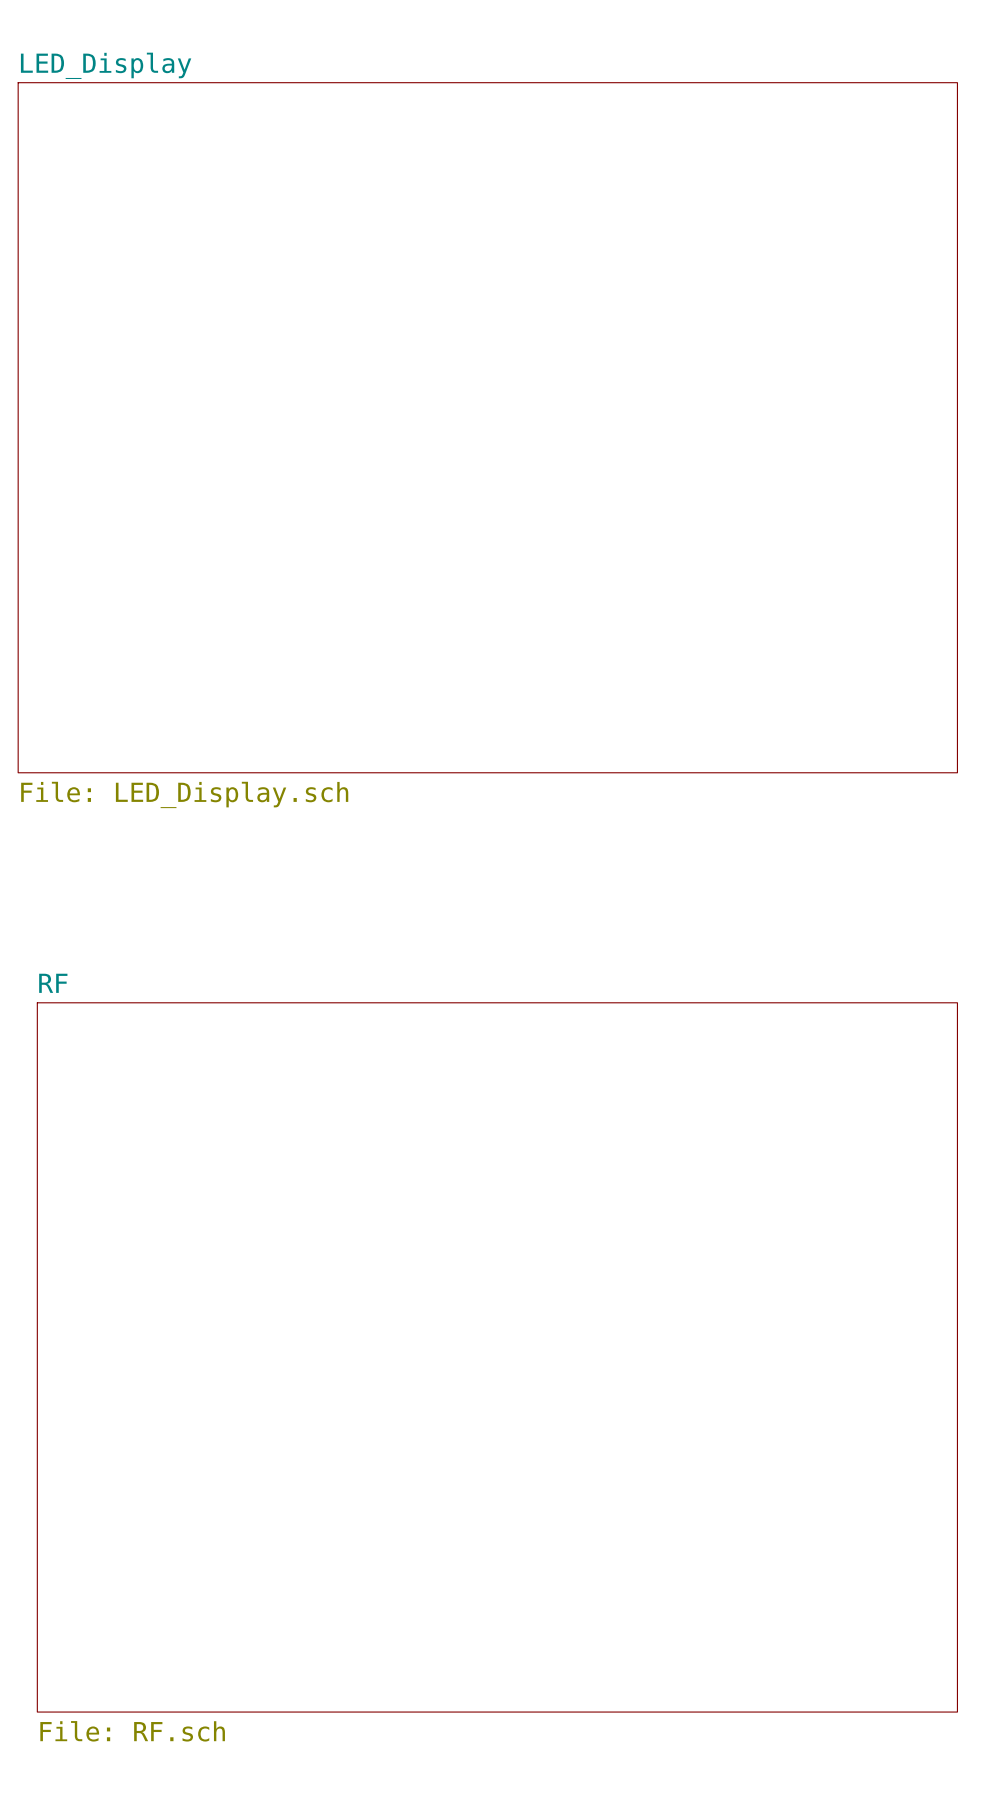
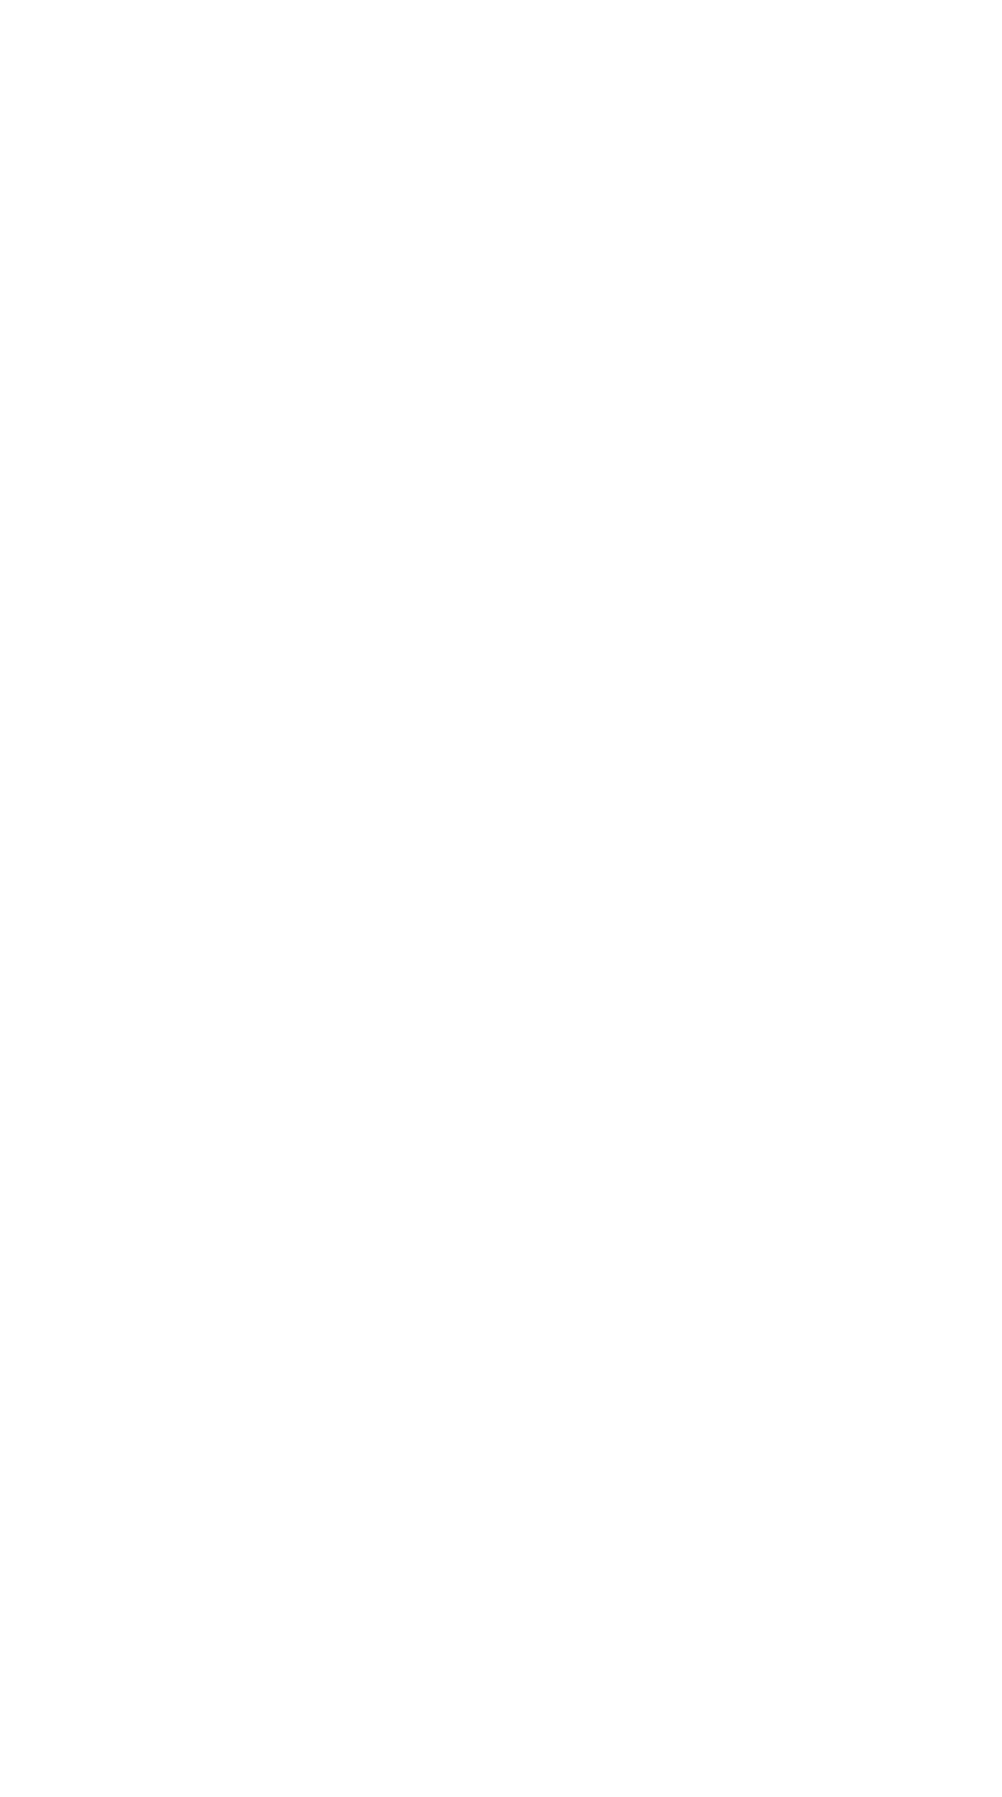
sheet LED_Display: File: LED_Display.sch (487, 427) -> none
sheet RF: File: RF.sch (497, 1357) -> none

